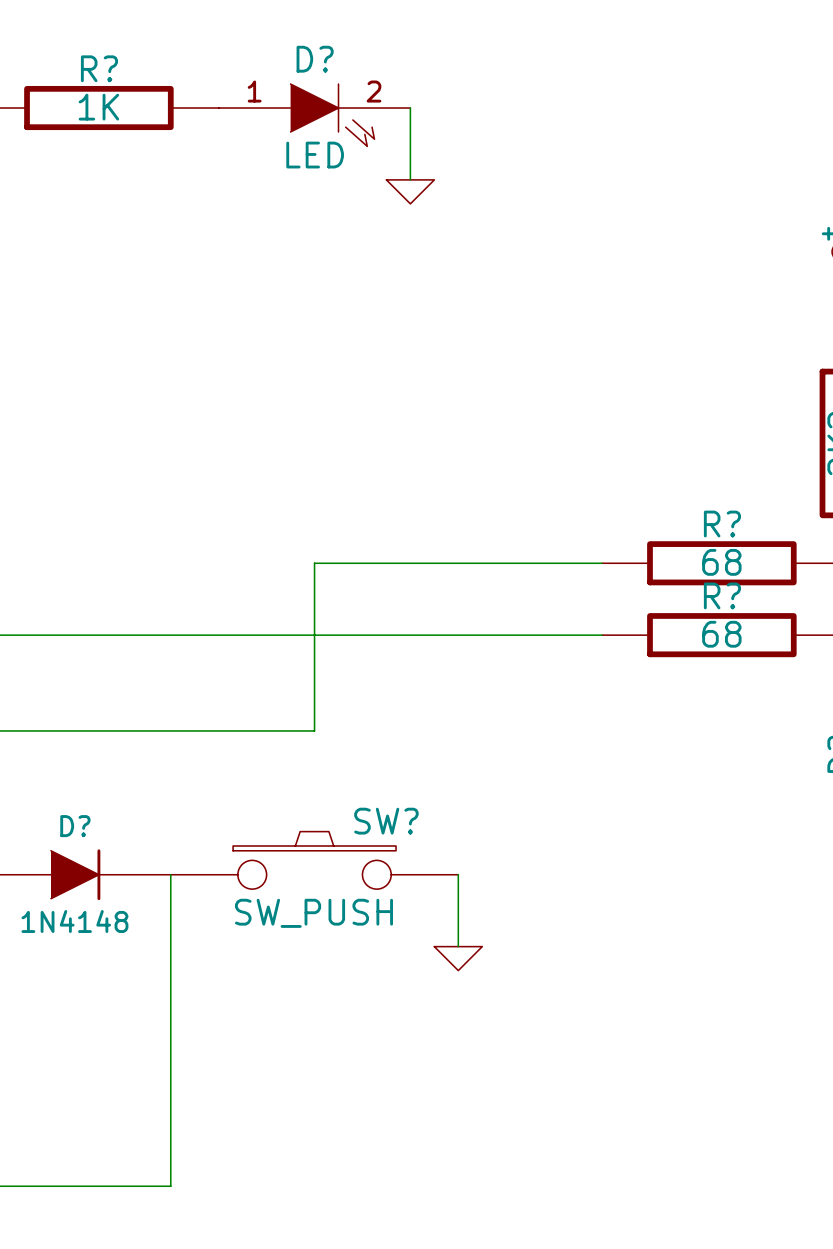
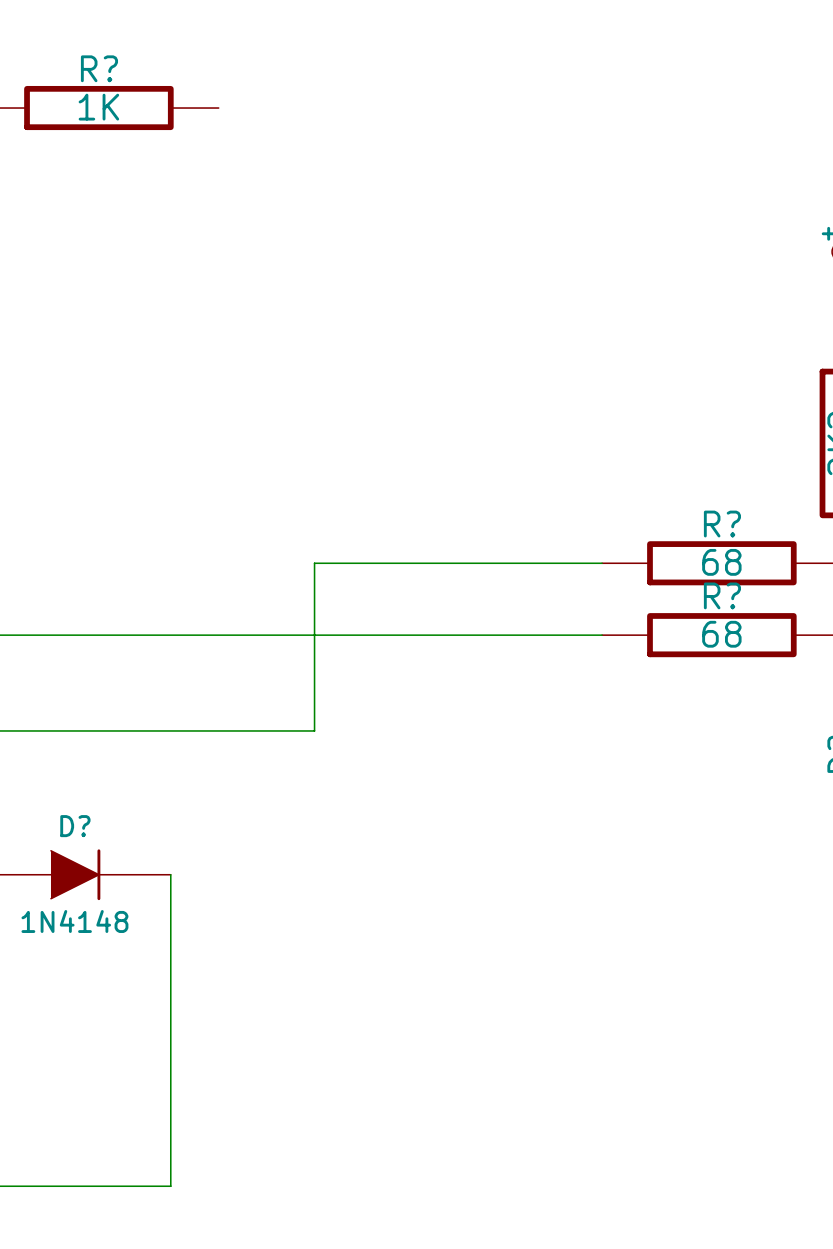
wire: (410, 108) (410, 179) -> none
D?: LED (314, 115) -> none
power symbol: (410, 191) -> none
SW?: SW_PUSH (314, 860) -> none
wire: (458, 874) (458, 946) -> none
power symbol: (458, 958) -> none

